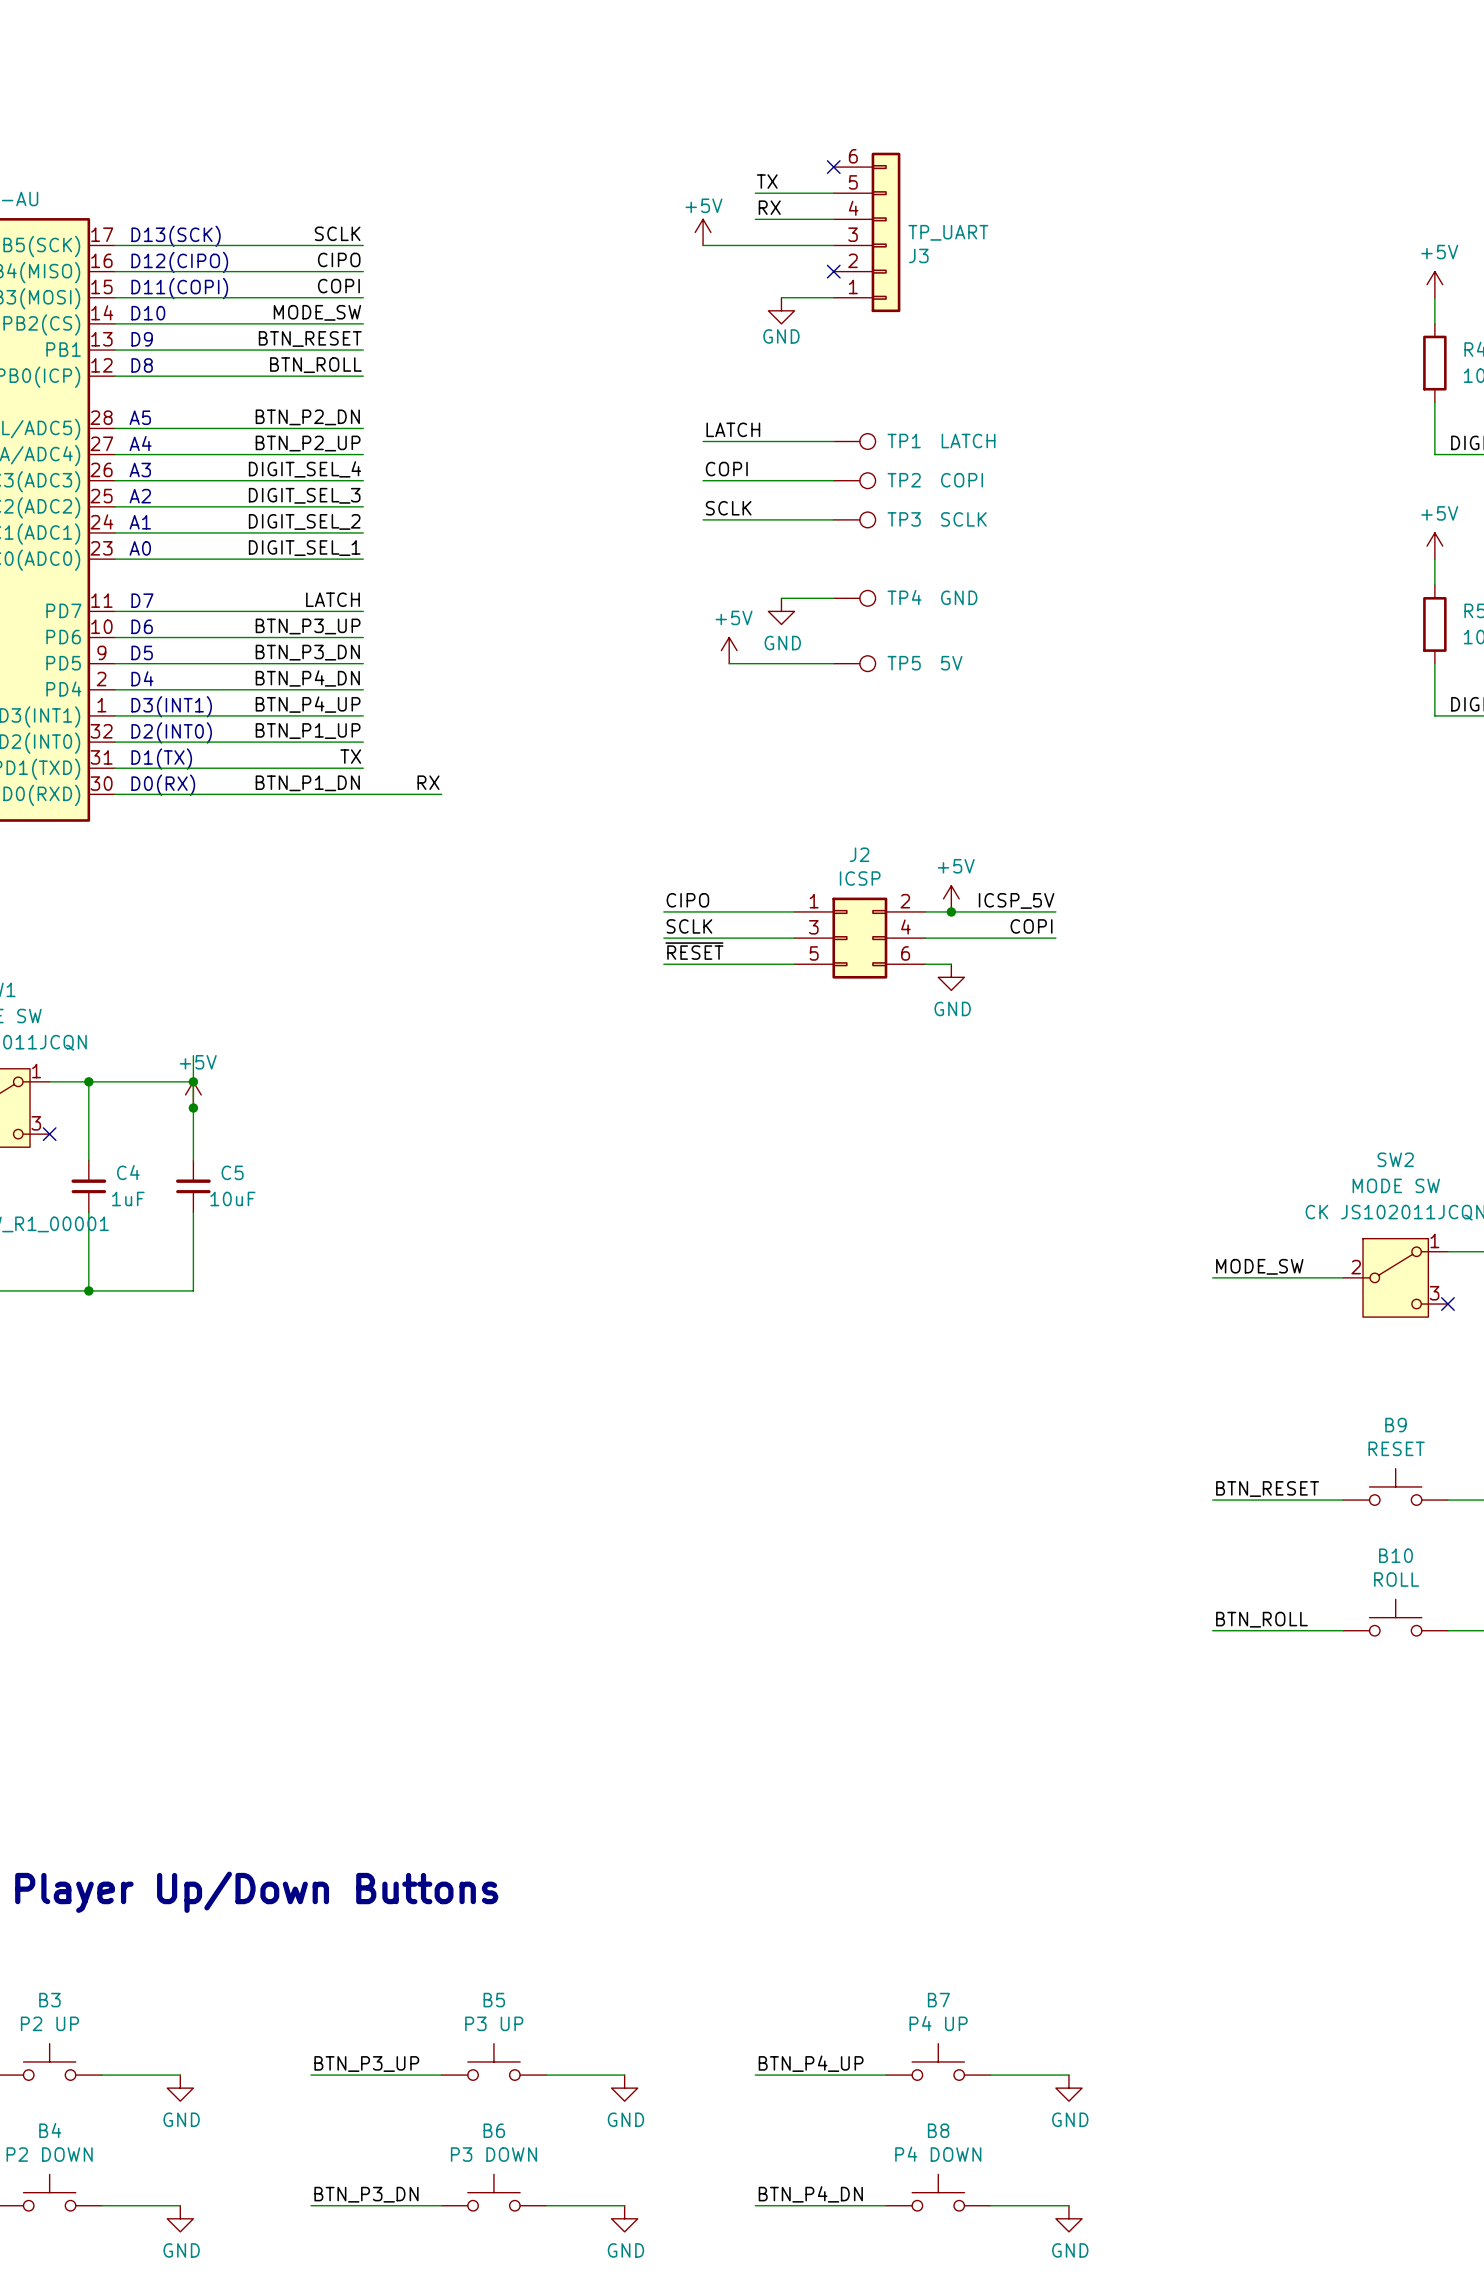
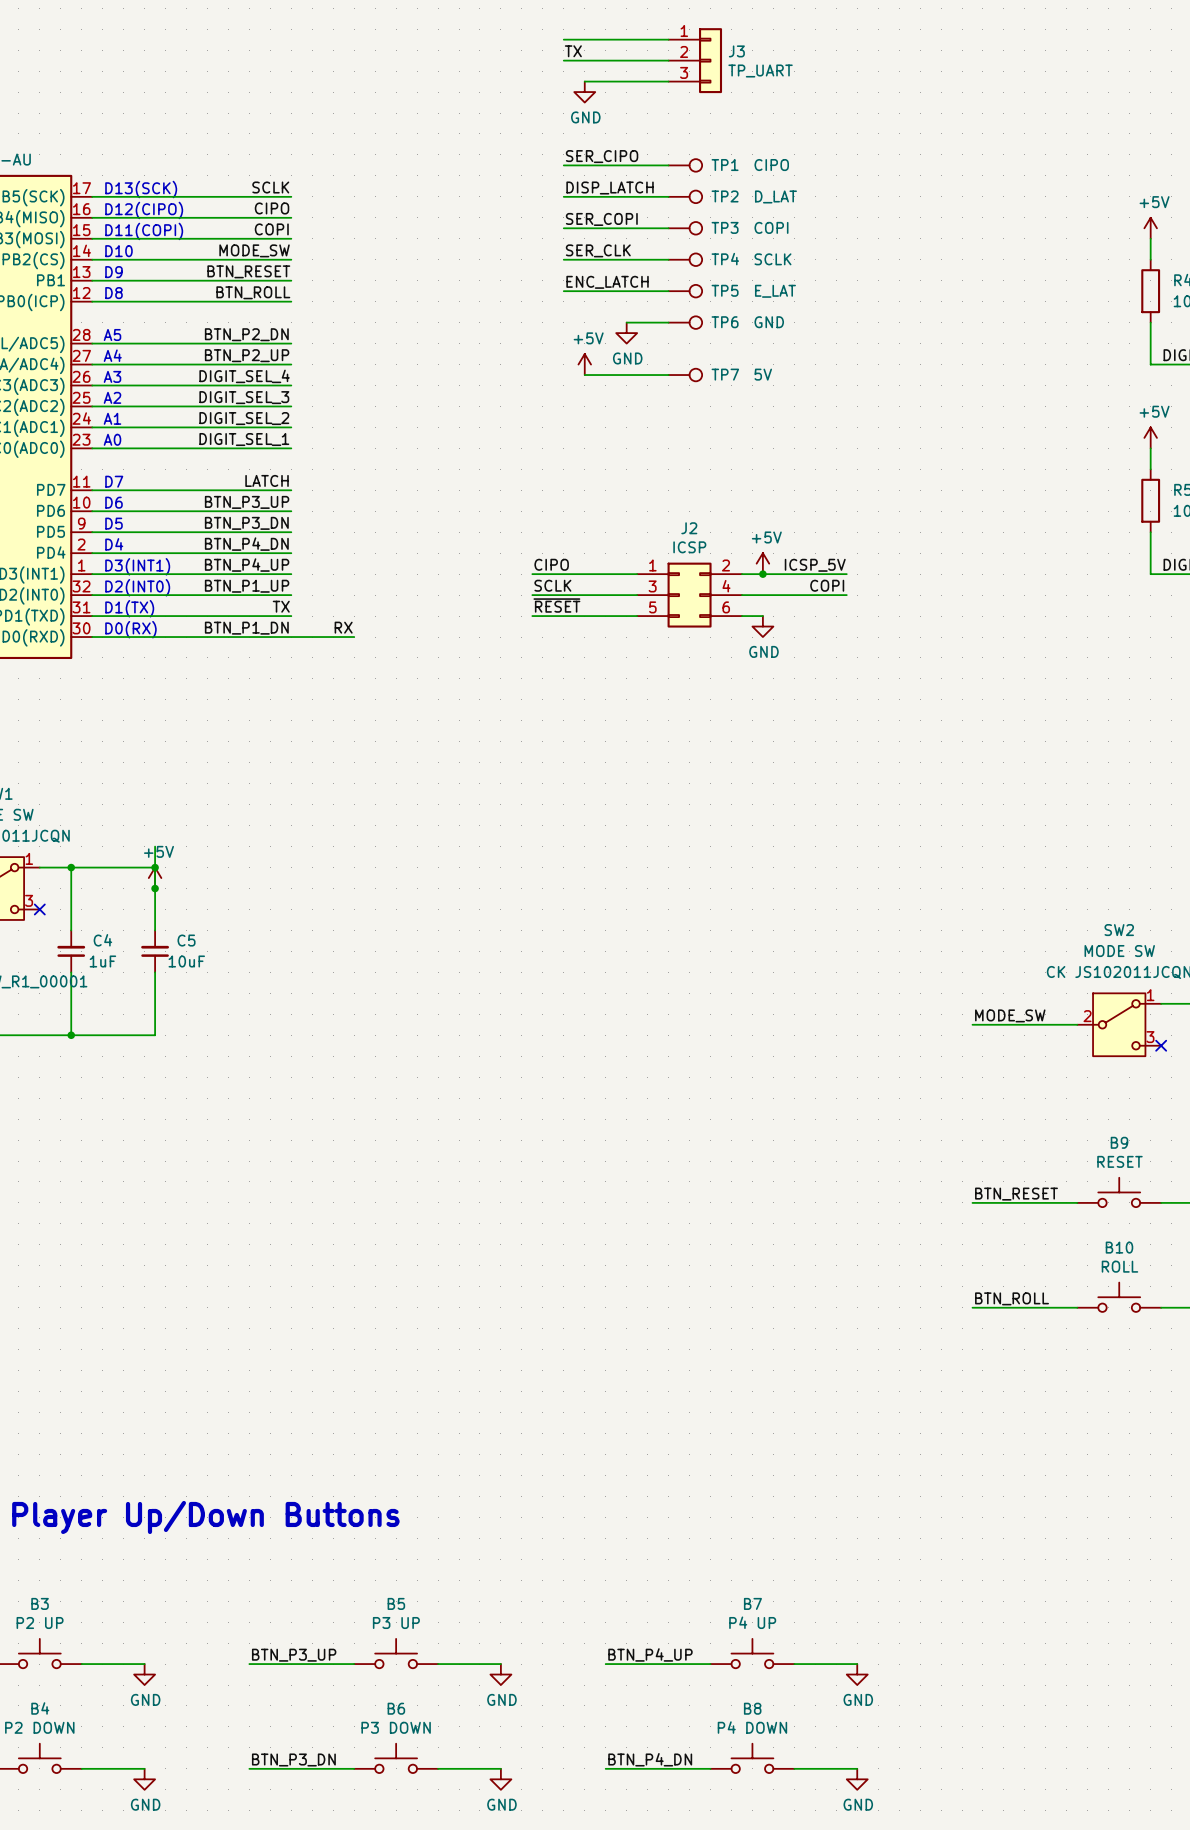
wire: none -> (563, 39) (668, 39)
wire: none -> (563, 60) (668, 60)
wire: none -> (584, 81) (668, 81)
power symbol: none -> GND (584, 92)
J3 symbol: [833, 152, 901, 313] -> [668, 28, 723, 94]
no-connect mark: (833, 167) -> none
label position: TX (767, 181) -> TX (573, 51)
wire: (755, 193) (833, 193) -> none
label: none -> SER_CIPO (602, 156)
label: RX (769, 207) -> none
wire: (755, 219) (833, 219) -> none
power symbol: +5V (703, 232) -> none
label: none -> DISP_LATCH (610, 188)
J3 name position: J3 (918, 255) -> J3 (736, 51)
no-connect mark: (833, 271) -> none
label: none -> SER_COPI (601, 219)
wire: (781, 297) (833, 297) -> none
power symbol: GND (781, 310) -> none
label: none -> SER_CLK (598, 250)
label: none -> ENC_LATCH (607, 282)
wire: none -> (563, 291) (668, 291)
TP6: none -> GND (685, 322)
power symbol: none -> GND (626, 333)
label: LATCH (733, 429) -> none
wire: (703, 441) (833, 441) -> (563, 165) (668, 165)
TP1 position: (854, 441) -> (685, 165)
TP1 value: LATCH (968, 441) -> CIPO (771, 165)
power symbol: none -> +5V (584, 364)
TP7: none -> 5V (685, 375)
label: COPI (726, 469) -> none
wire: (703, 480) (833, 480) -> (563, 228) (668, 228)
TP2 position: (854, 480) -> (685, 196)
TP2 value: COPI (962, 480) -> D_LAT (775, 196)
label: SCLK (728, 508) -> none
wire: (703, 519) (833, 519) -> (563, 259) (668, 259)
TP3 position: (854, 519) -> (685, 228)
TP3 value: SCLK (963, 519) -> COPI (771, 227)
TP4 value: GND (959, 597) -> SCLK (772, 259)
wire: (781, 598) (833, 598) -> (626, 322) (668, 322)
TP4 position: (854, 598) -> (685, 259)
power symbol: GND (781, 611) -> none
power symbol: +5V (729, 650) -> none
wire: (729, 663) (833, 663) -> (584, 375) (668, 375)
TP5 position: (854, 663) -> (685, 291)
TP5 value: 5V (951, 663) -> E_LAT (775, 291)
power symbol: none -> +5V (762, 563)
junction: none -> (762, 574)
label: none -> SCLK (552, 585)
power symbol: none -> GND (762, 626)
power symbol: +5V (951, 898) -> none
label position: CIPO (687, 900) -> CIPO (551, 564)
label position: ICSP_5V (1016, 900) -> ICSP_5V (815, 565)
wire: (663, 911) (794, 911) -> (532, 574) (637, 574)
wire: (925, 911) (1055, 911) -> (741, 574) (846, 574)
junction: (951, 911) -> none
label: SCLK (689, 926) -> none
label position: COPI (1031, 926) -> COPI (827, 585)
wire: (663, 938) (794, 938) -> (532, 595) (637, 595)
J2 position: (859, 938) -> (689, 595)
wire: (925, 938) (1055, 938) -> (741, 595) (846, 595)
label position: ~{RESET} (694, 951) -> ~{RESET} (556, 605)
wire: (663, 964) (794, 964) -> (532, 616) (637, 616)
wire: (925, 964) (951, 964) -> (741, 616) (762, 616)
power symbol: GND (951, 977) -> none

